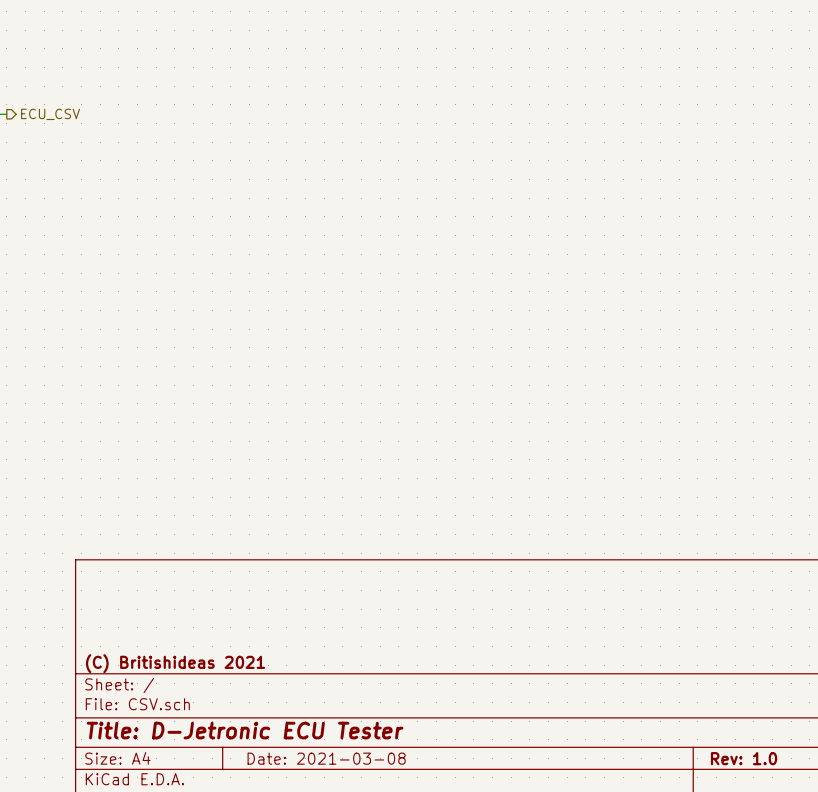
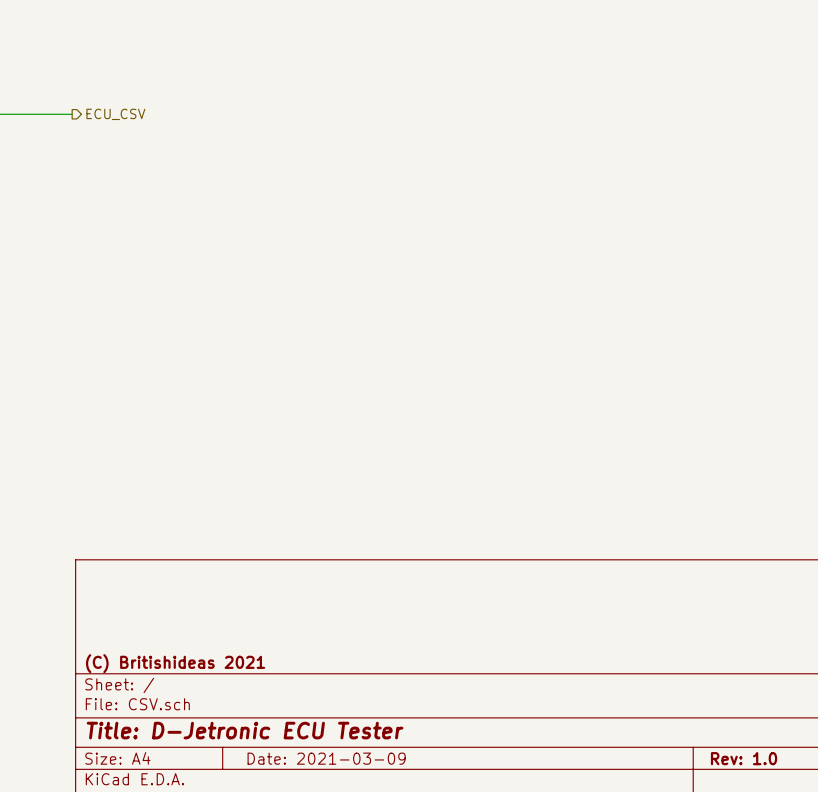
wire: none -> (6, 114) (72, 114)
hierarchical label position: ECU_CSV (50, 114) -> ECU_CSV (115, 114)
title block: Date: 2021-03-08 (326, 758) -> Date: 2021-03-09 (326, 758)

